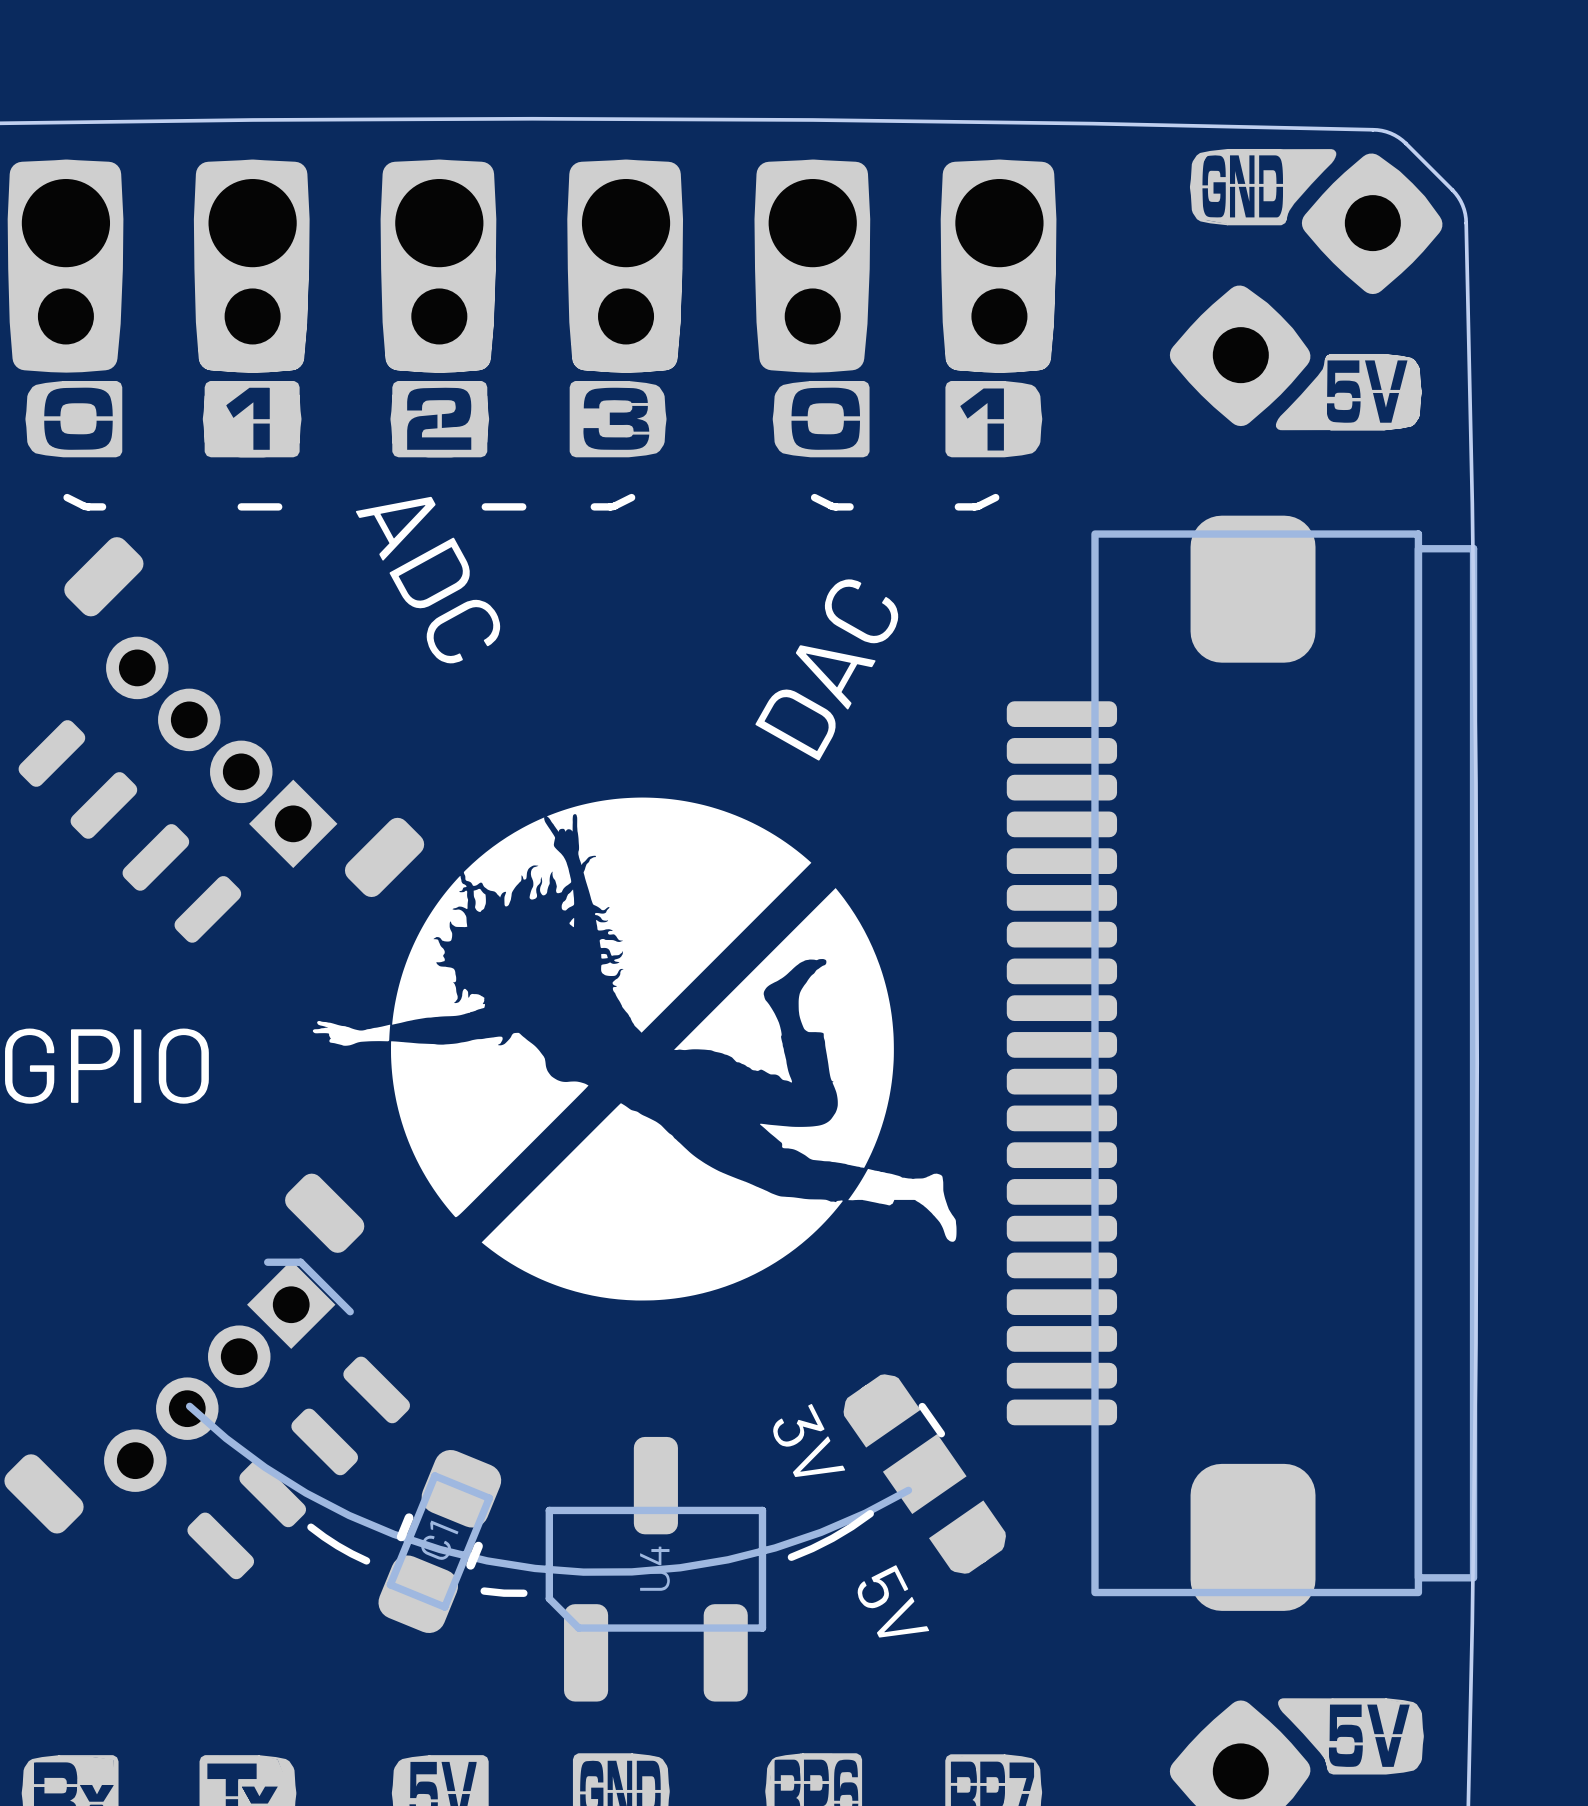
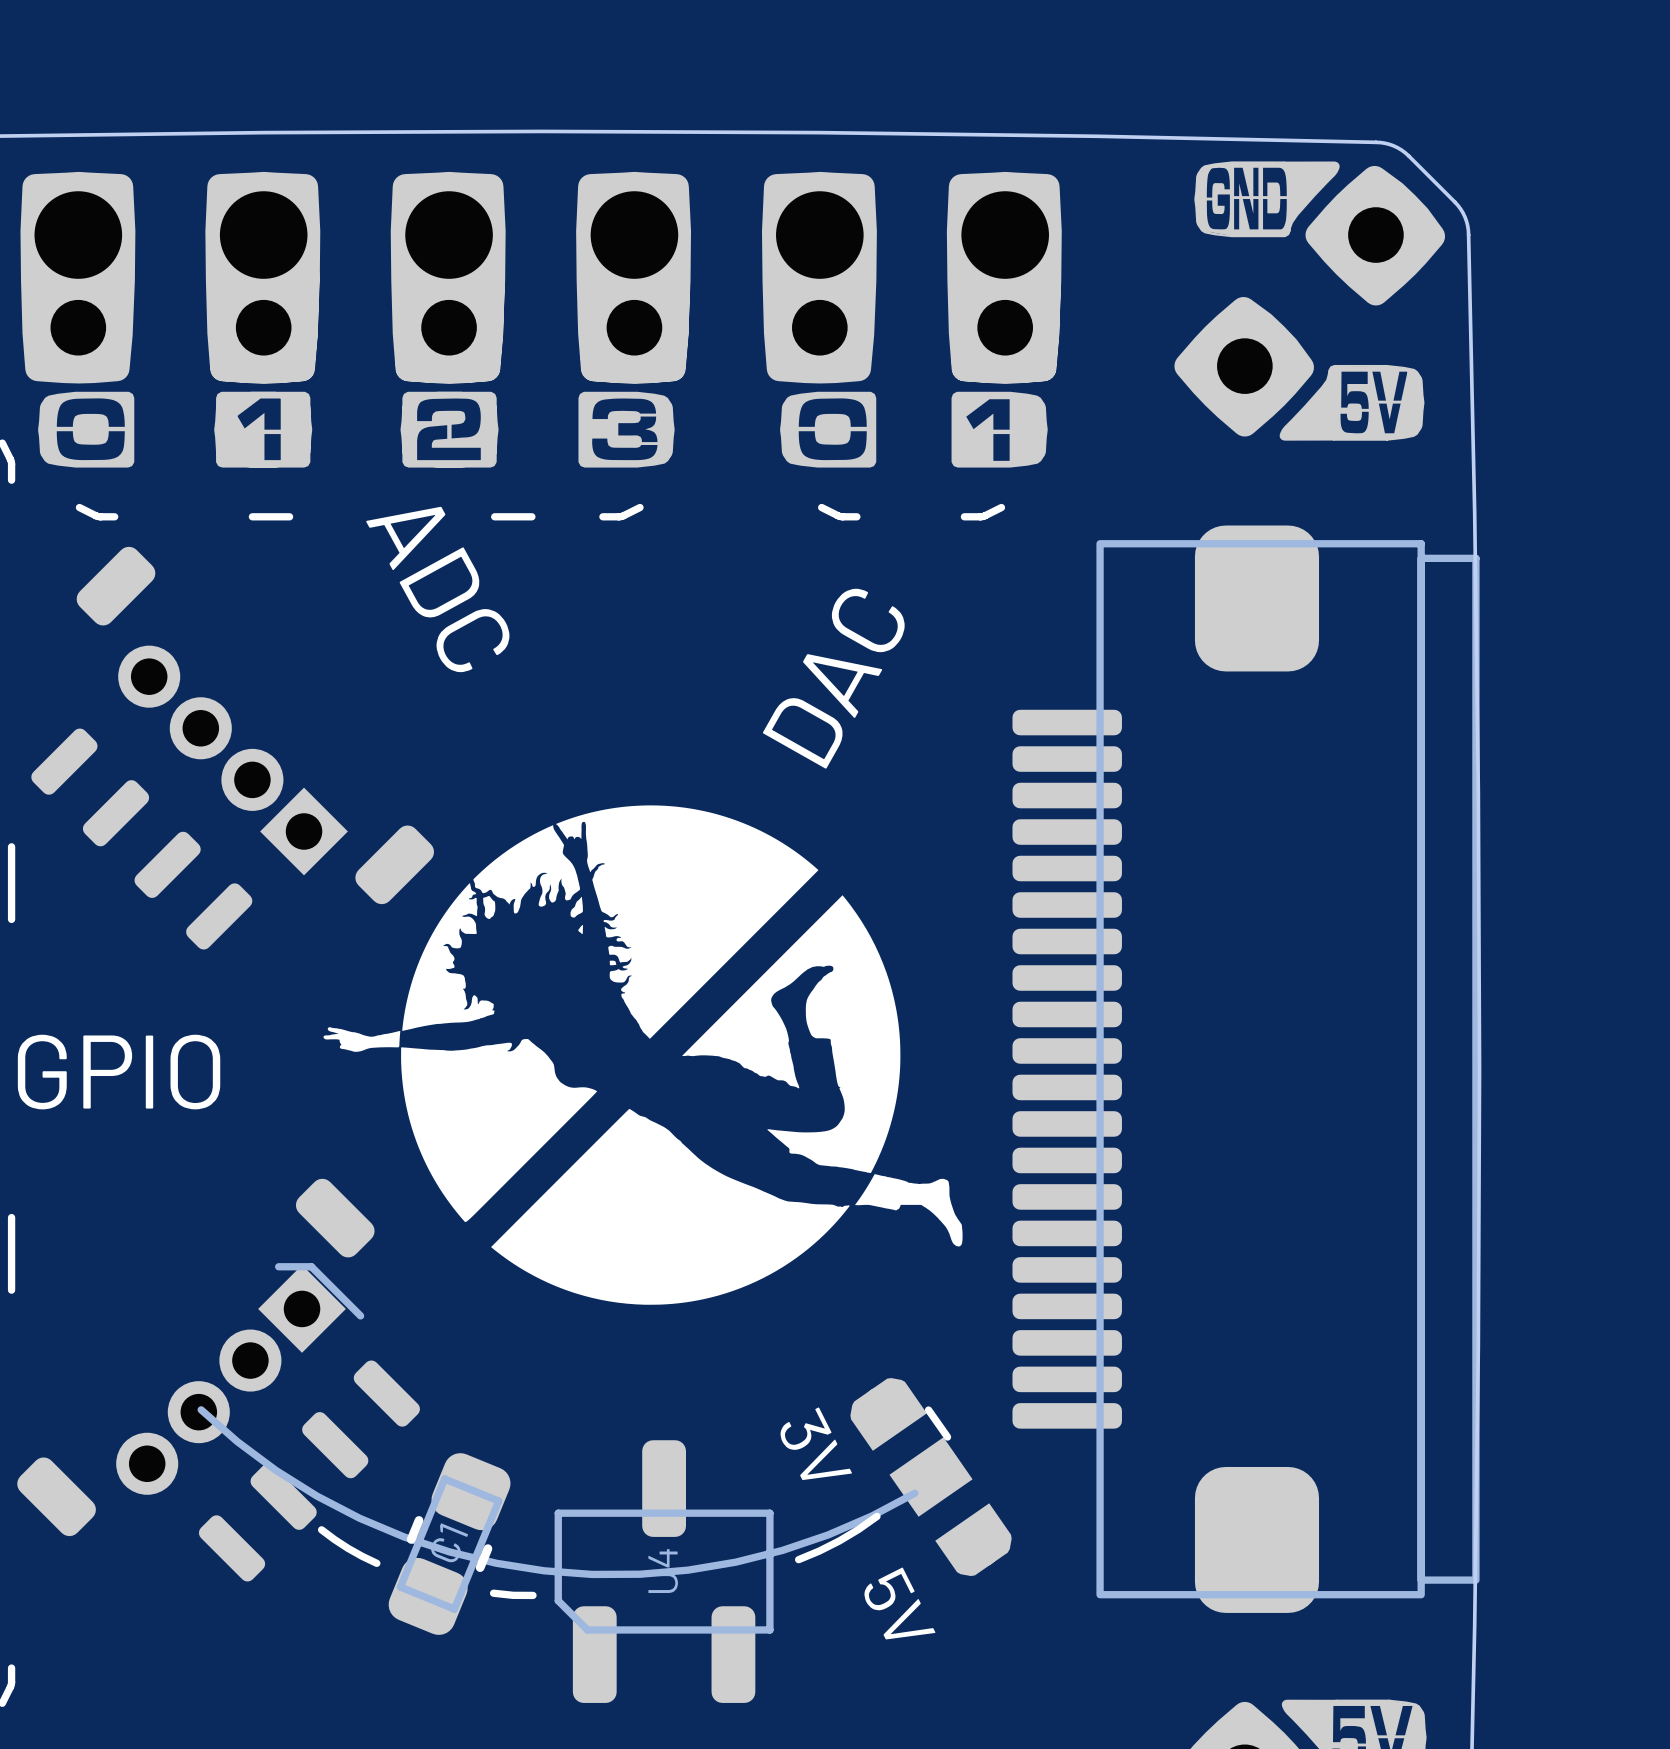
part footprint: [1275, 354, 1422, 431] -> [1279, 365, 1425, 441]

